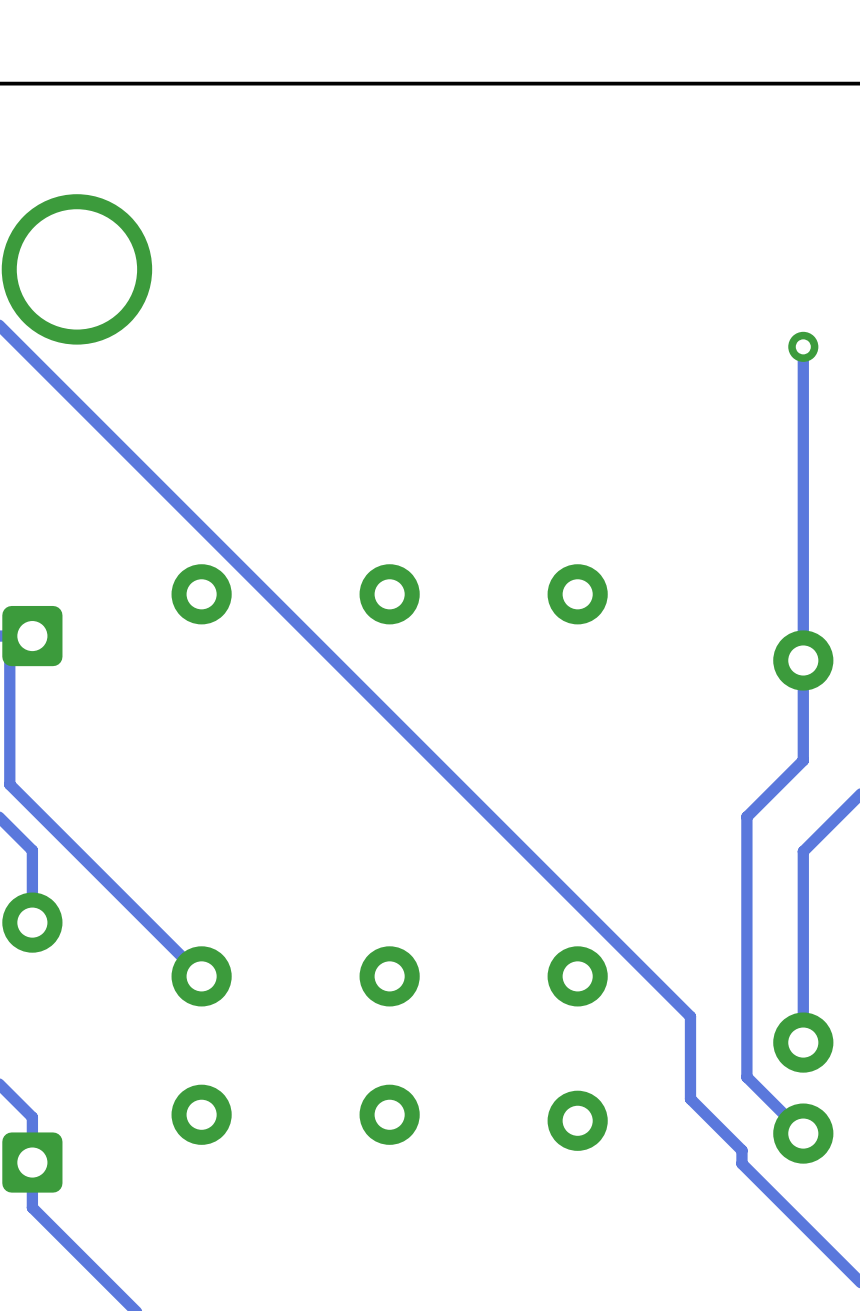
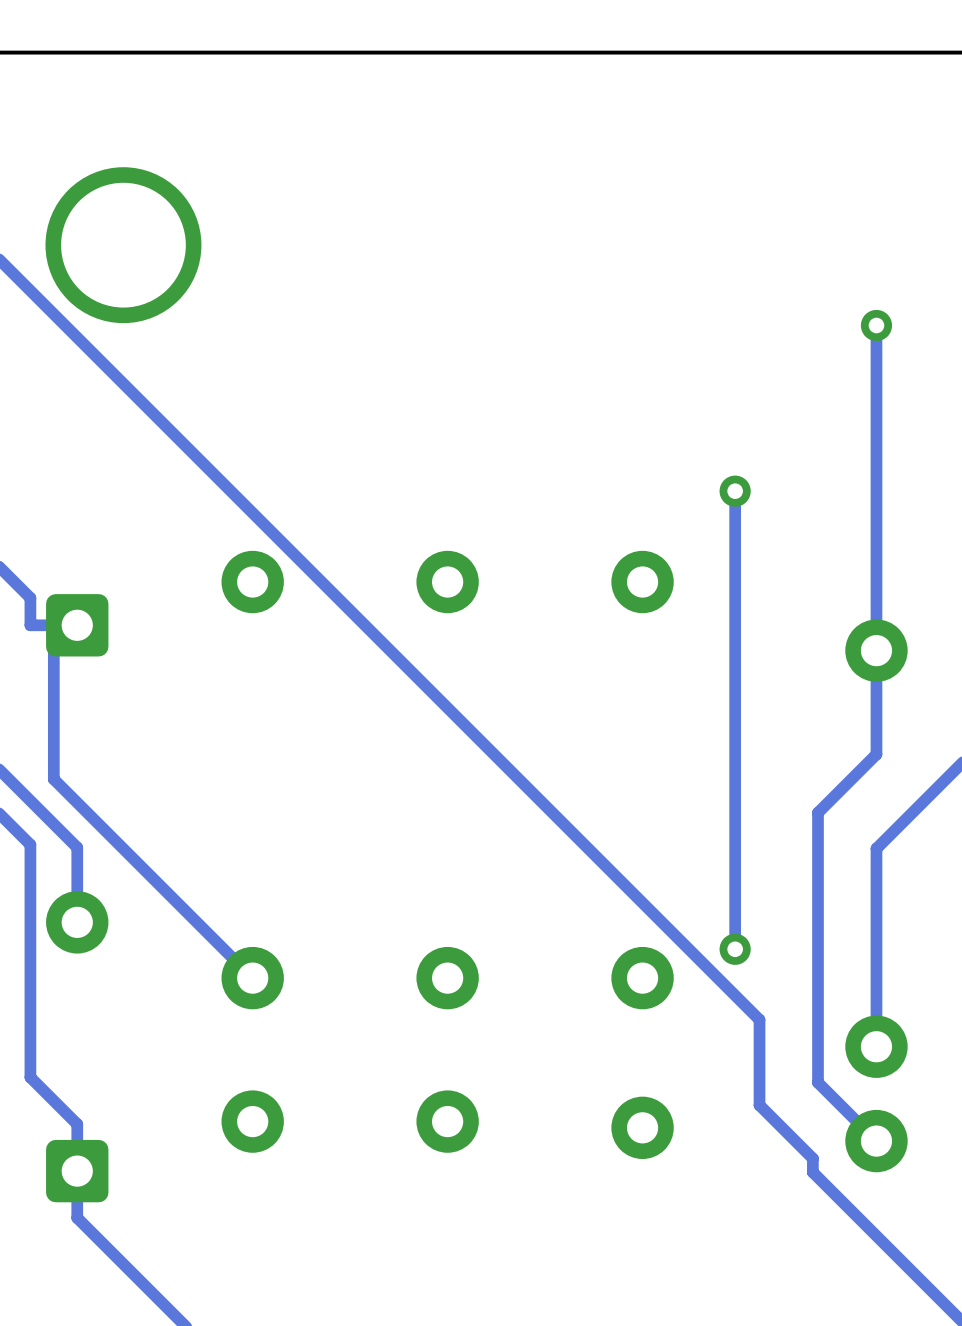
track: none -> (735, 491) (735, 949)
via: none -> (735, 491)
via: none -> (735, 949)

